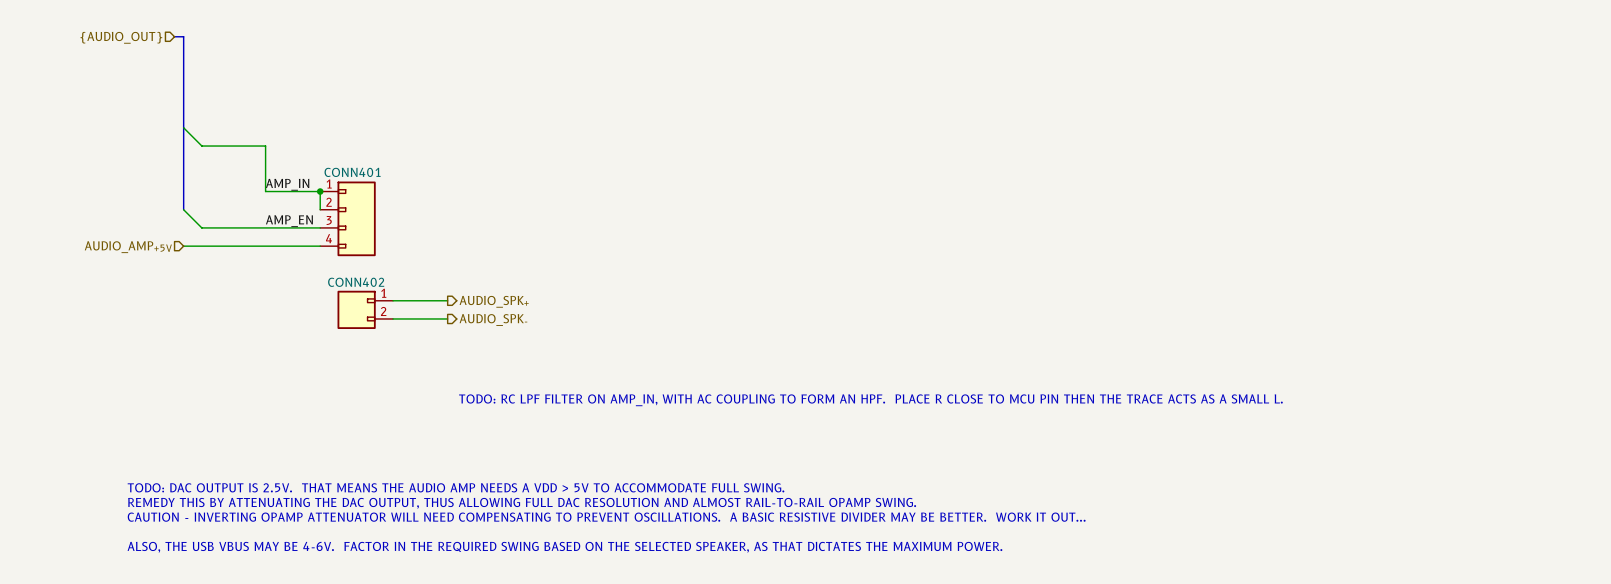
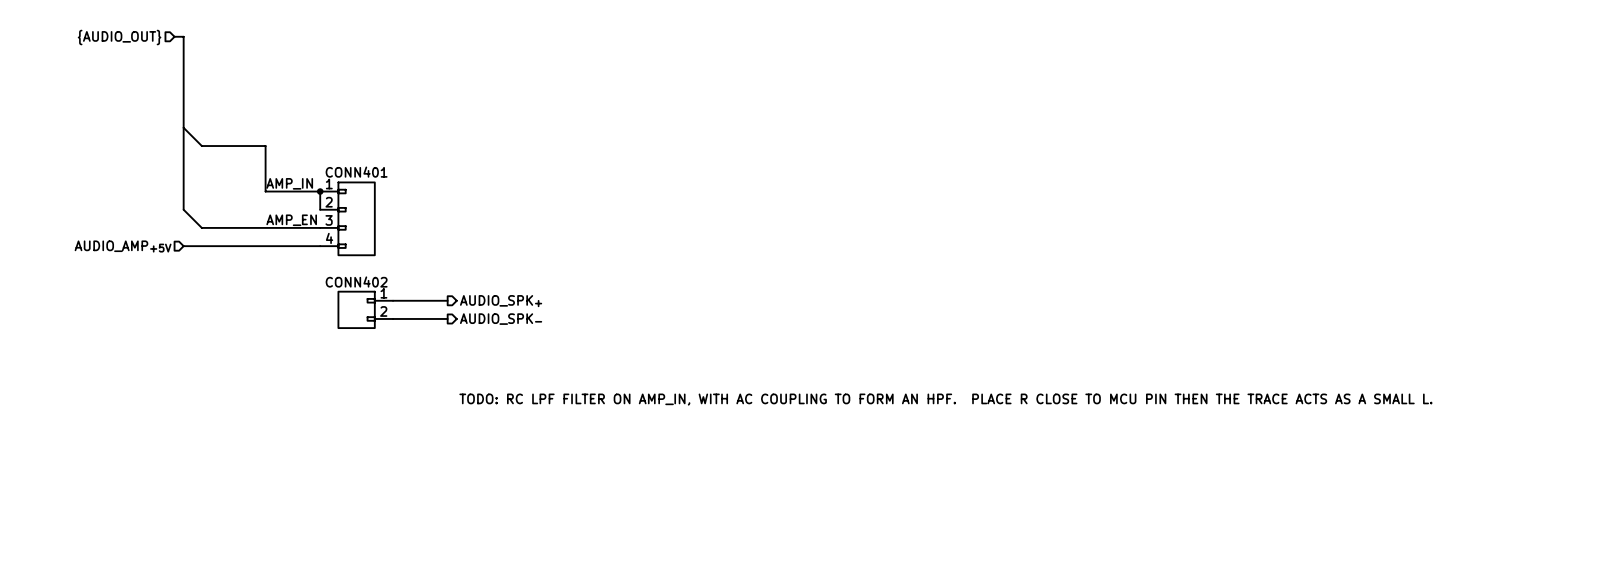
text: TODO: DAC OUTPUT IS 2.5V. THAT MEANS THE AUDIO AMP NEEDS A VDD > 5V TO ACCOMMODATE FULL SWING. (456, 487) -> none
text: REMEDY THIS BY ATTENUATING THE DAC OUTPUT, THUS ALLOWING FULL DAC RESOLUTION AND ALMOST RAIL-TO-RAIL OPAMP SWING. (522, 503) -> none
text: CAUTION - INVERTING OPAMP ATTENUATOR WILL NEED COMPENSATING TO PREVENT OSCILLATIONS. A BASIC RESISTIVE DIVIDER MAY BE BETTER. WORK IT OUT... (606, 517) -> none
text: ALSO, THE USB VBUS MAY BE 4-6V. FACTOR IN THE REQUIRED SWING BASED ON THE SELECTED SPEAKER, AS THAT DICTATES THE MAXIMUM POWER. (564, 547) -> none

